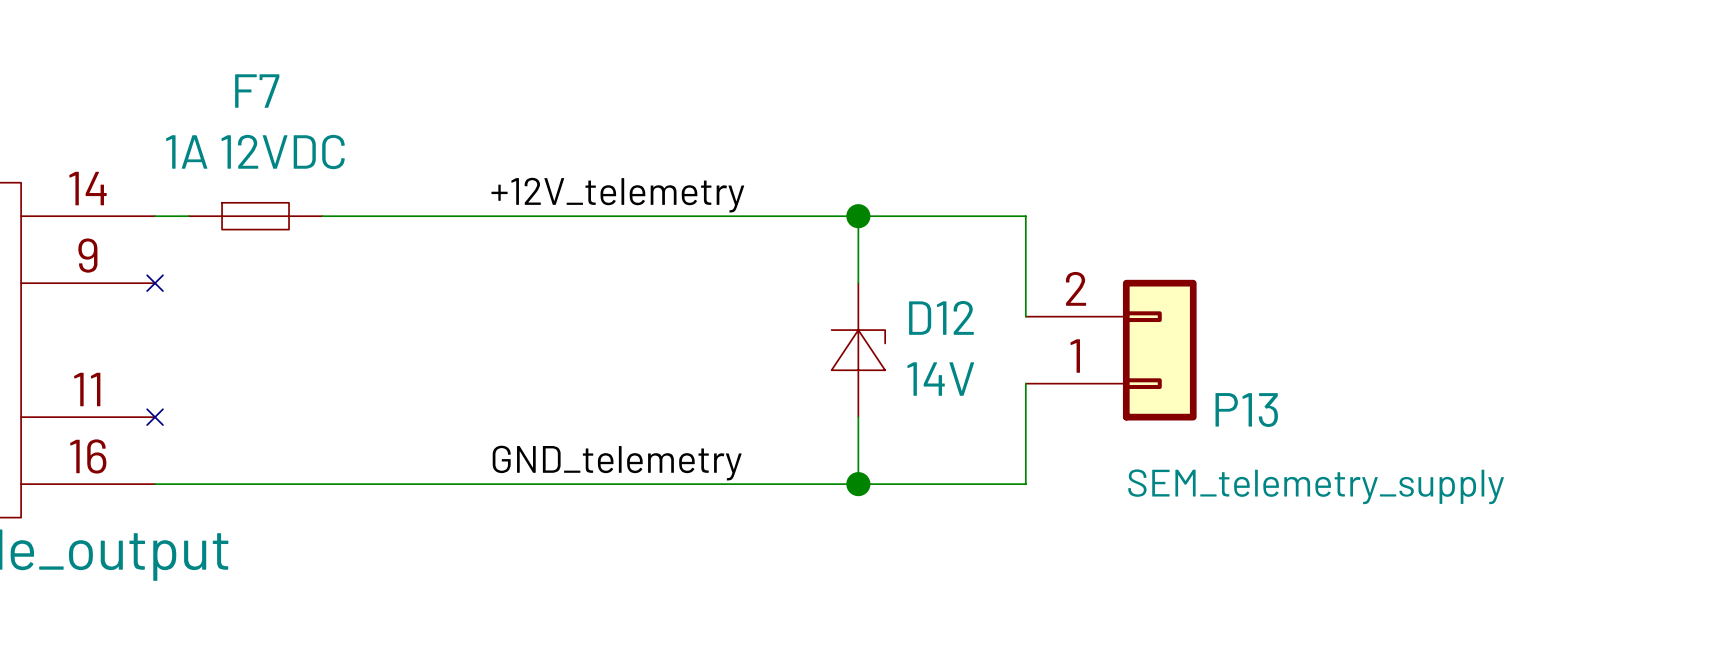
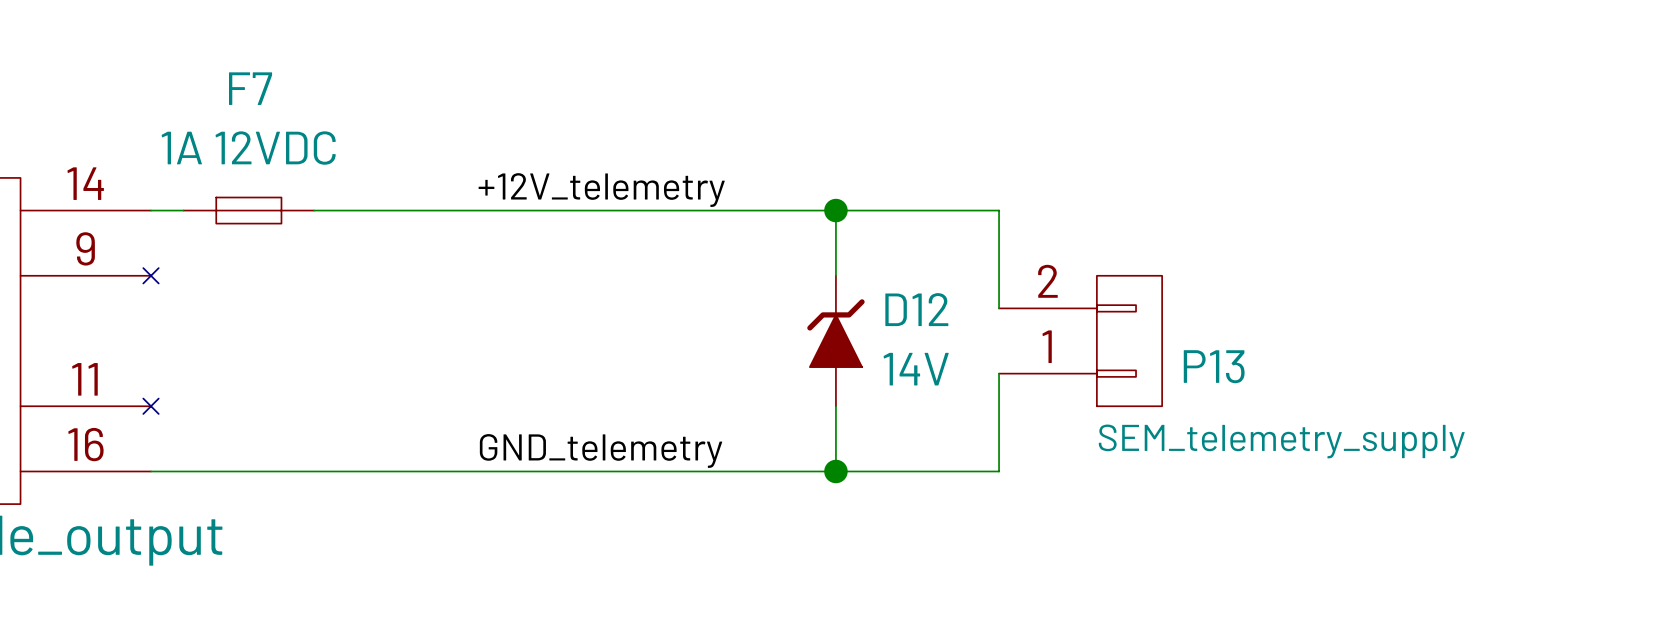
P13 symbol: [1025, 279, 1197, 421] -> [999, 275, 1163, 407]
D12 symbol: [831, 283, 886, 418] -> [807, 275, 865, 407]

